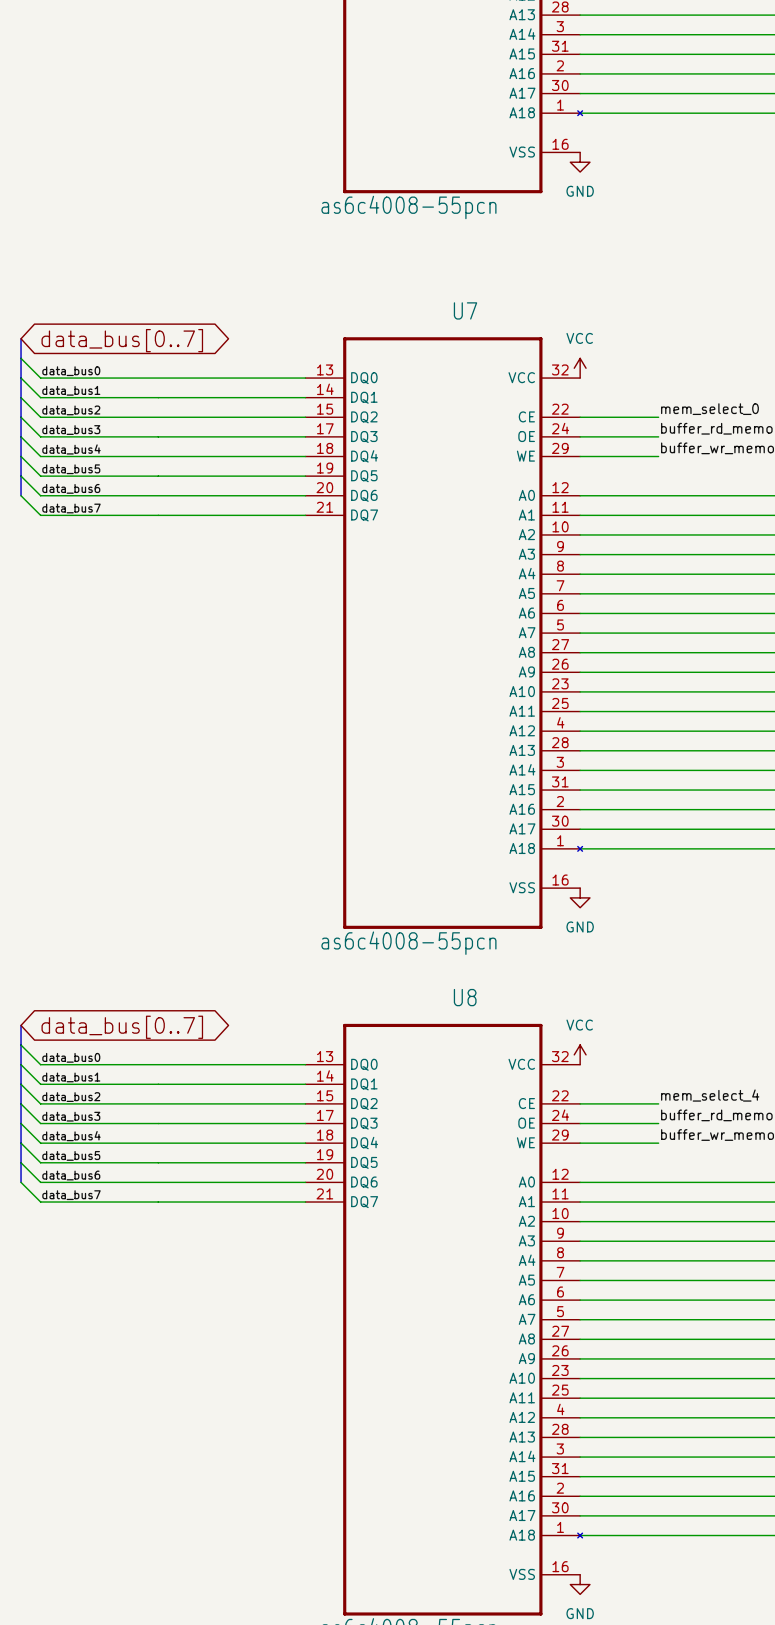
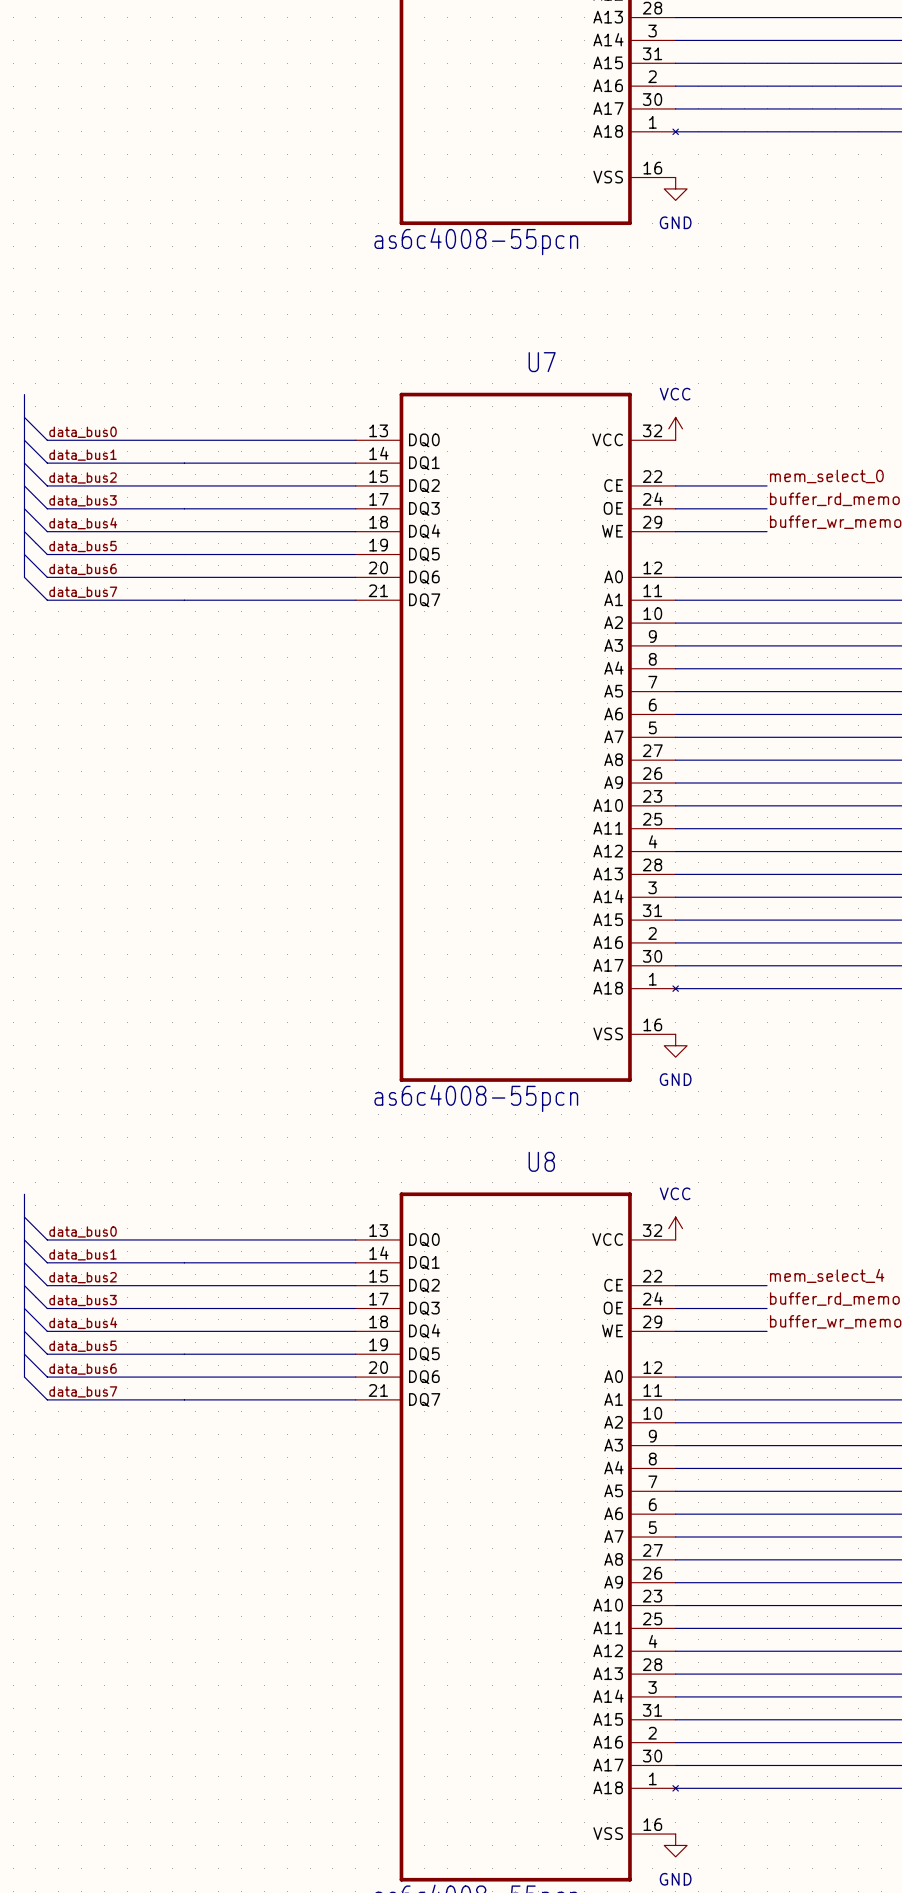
global label: data_bus[0..7] (122, 340) -> none
global label: data_bus[0..7] (122, 1027) -> none

